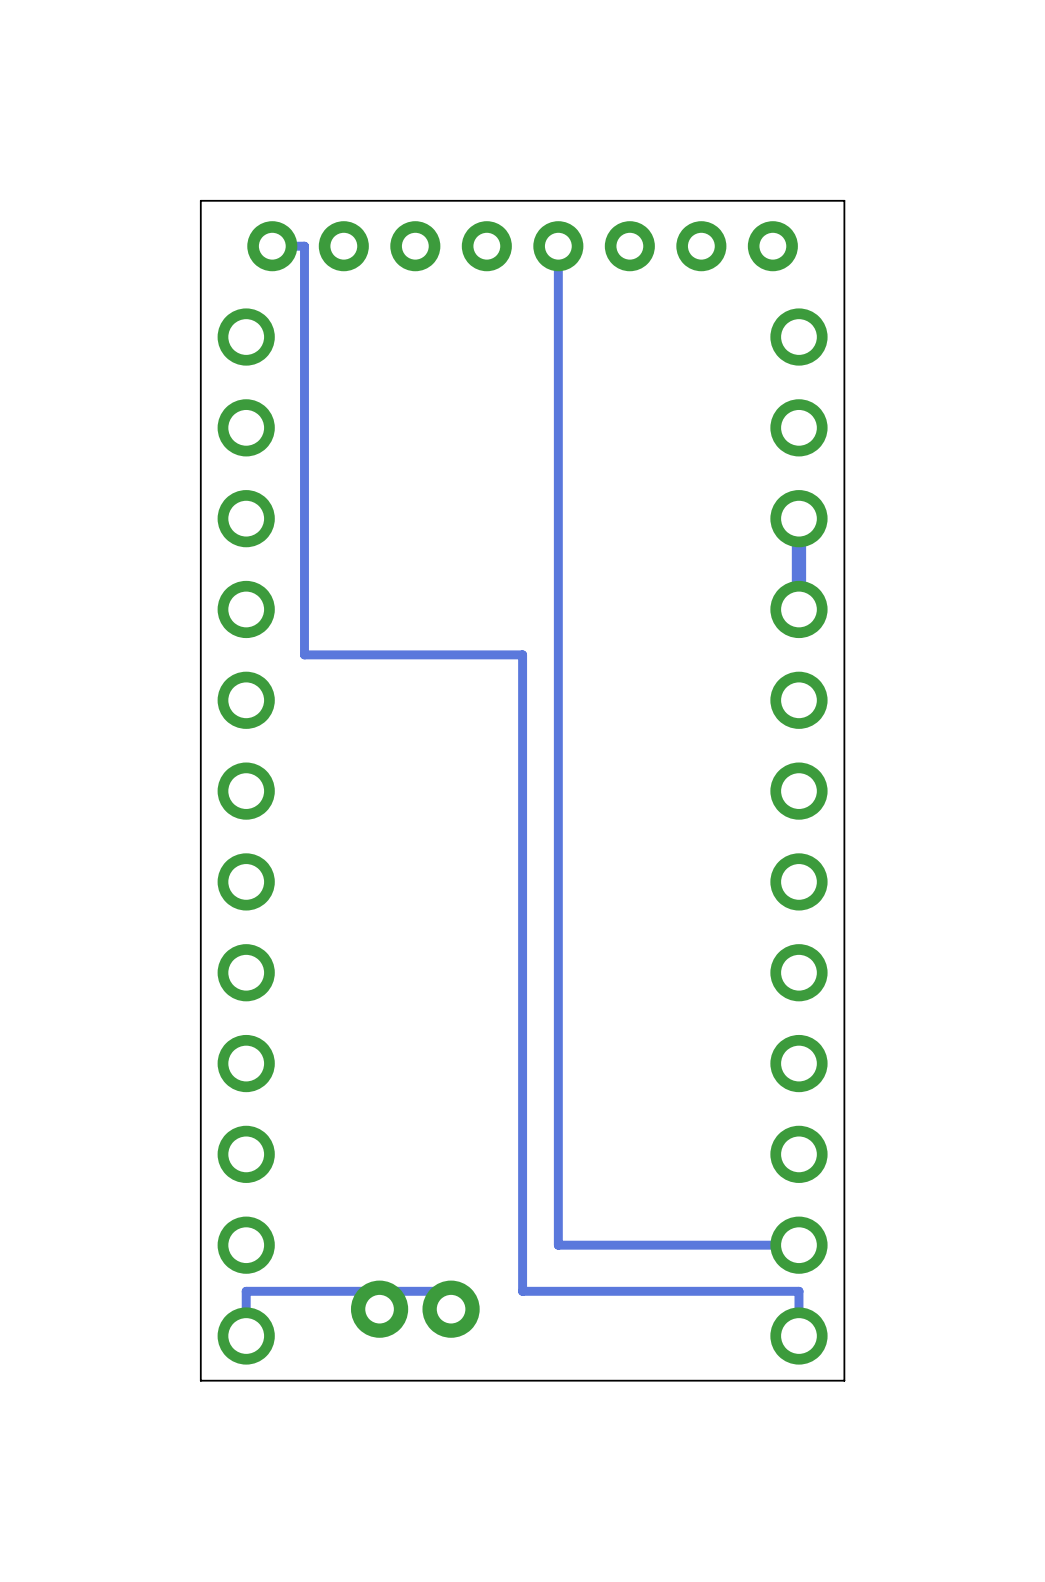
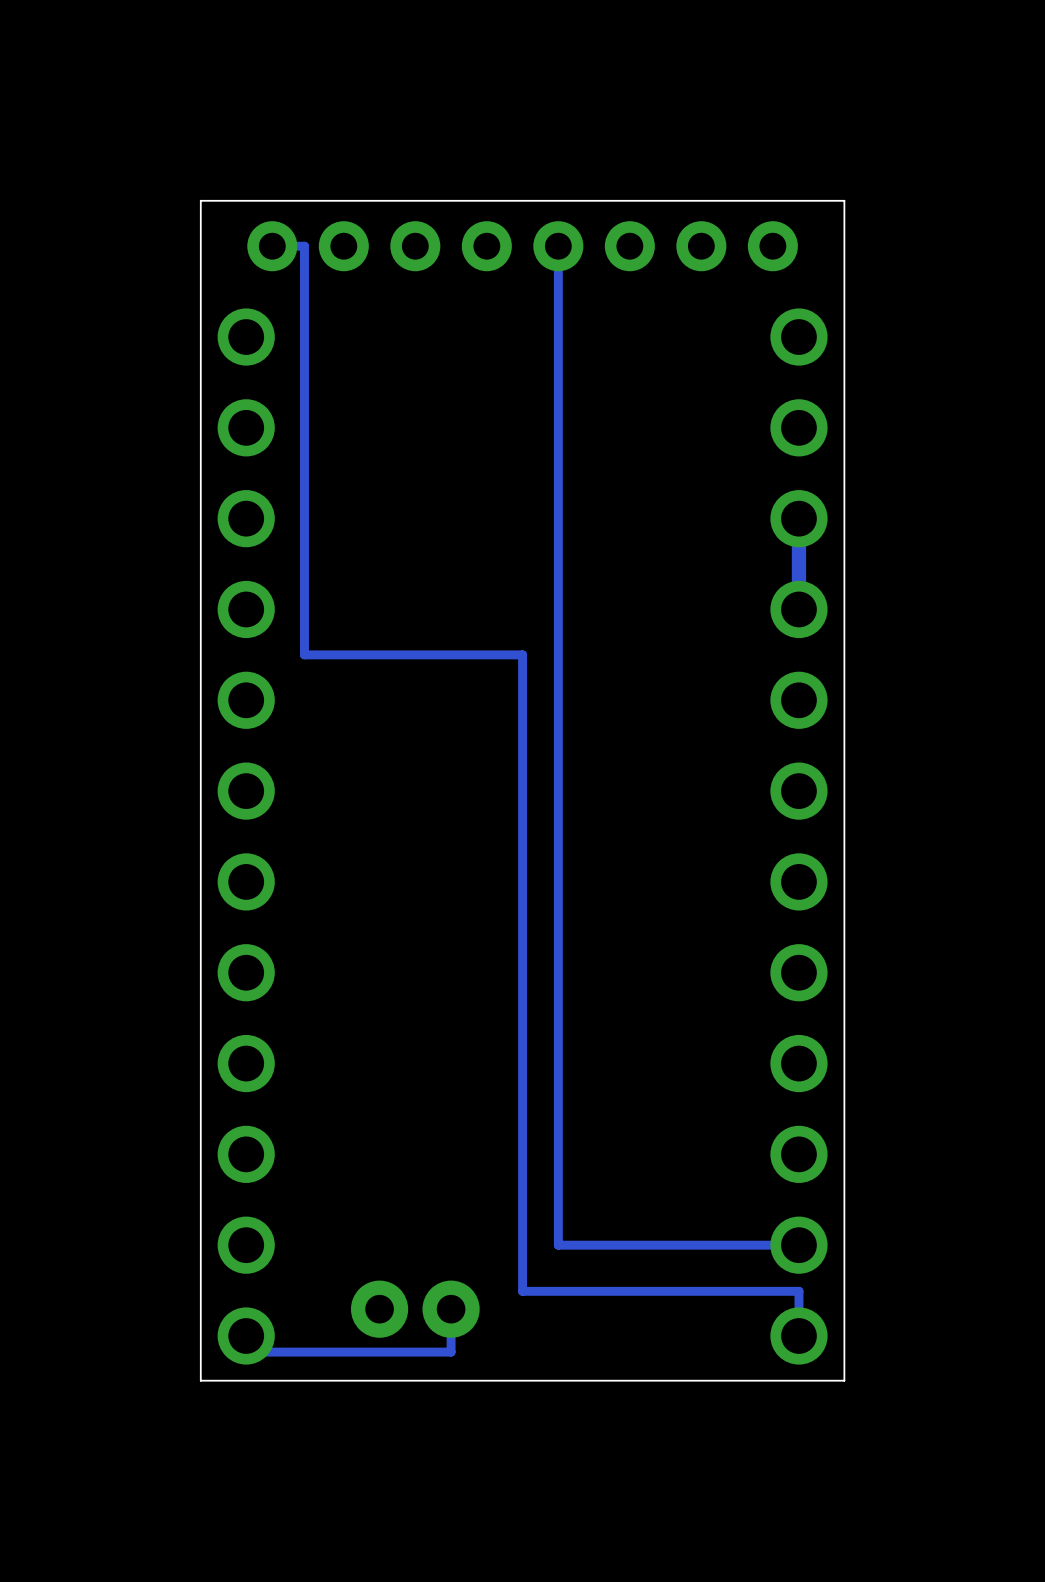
track: (451, 1309) (451, 1291) (246, 1291) (246, 1336) -> (451, 1309) (451, 1352) (246, 1352) (246, 1336)

